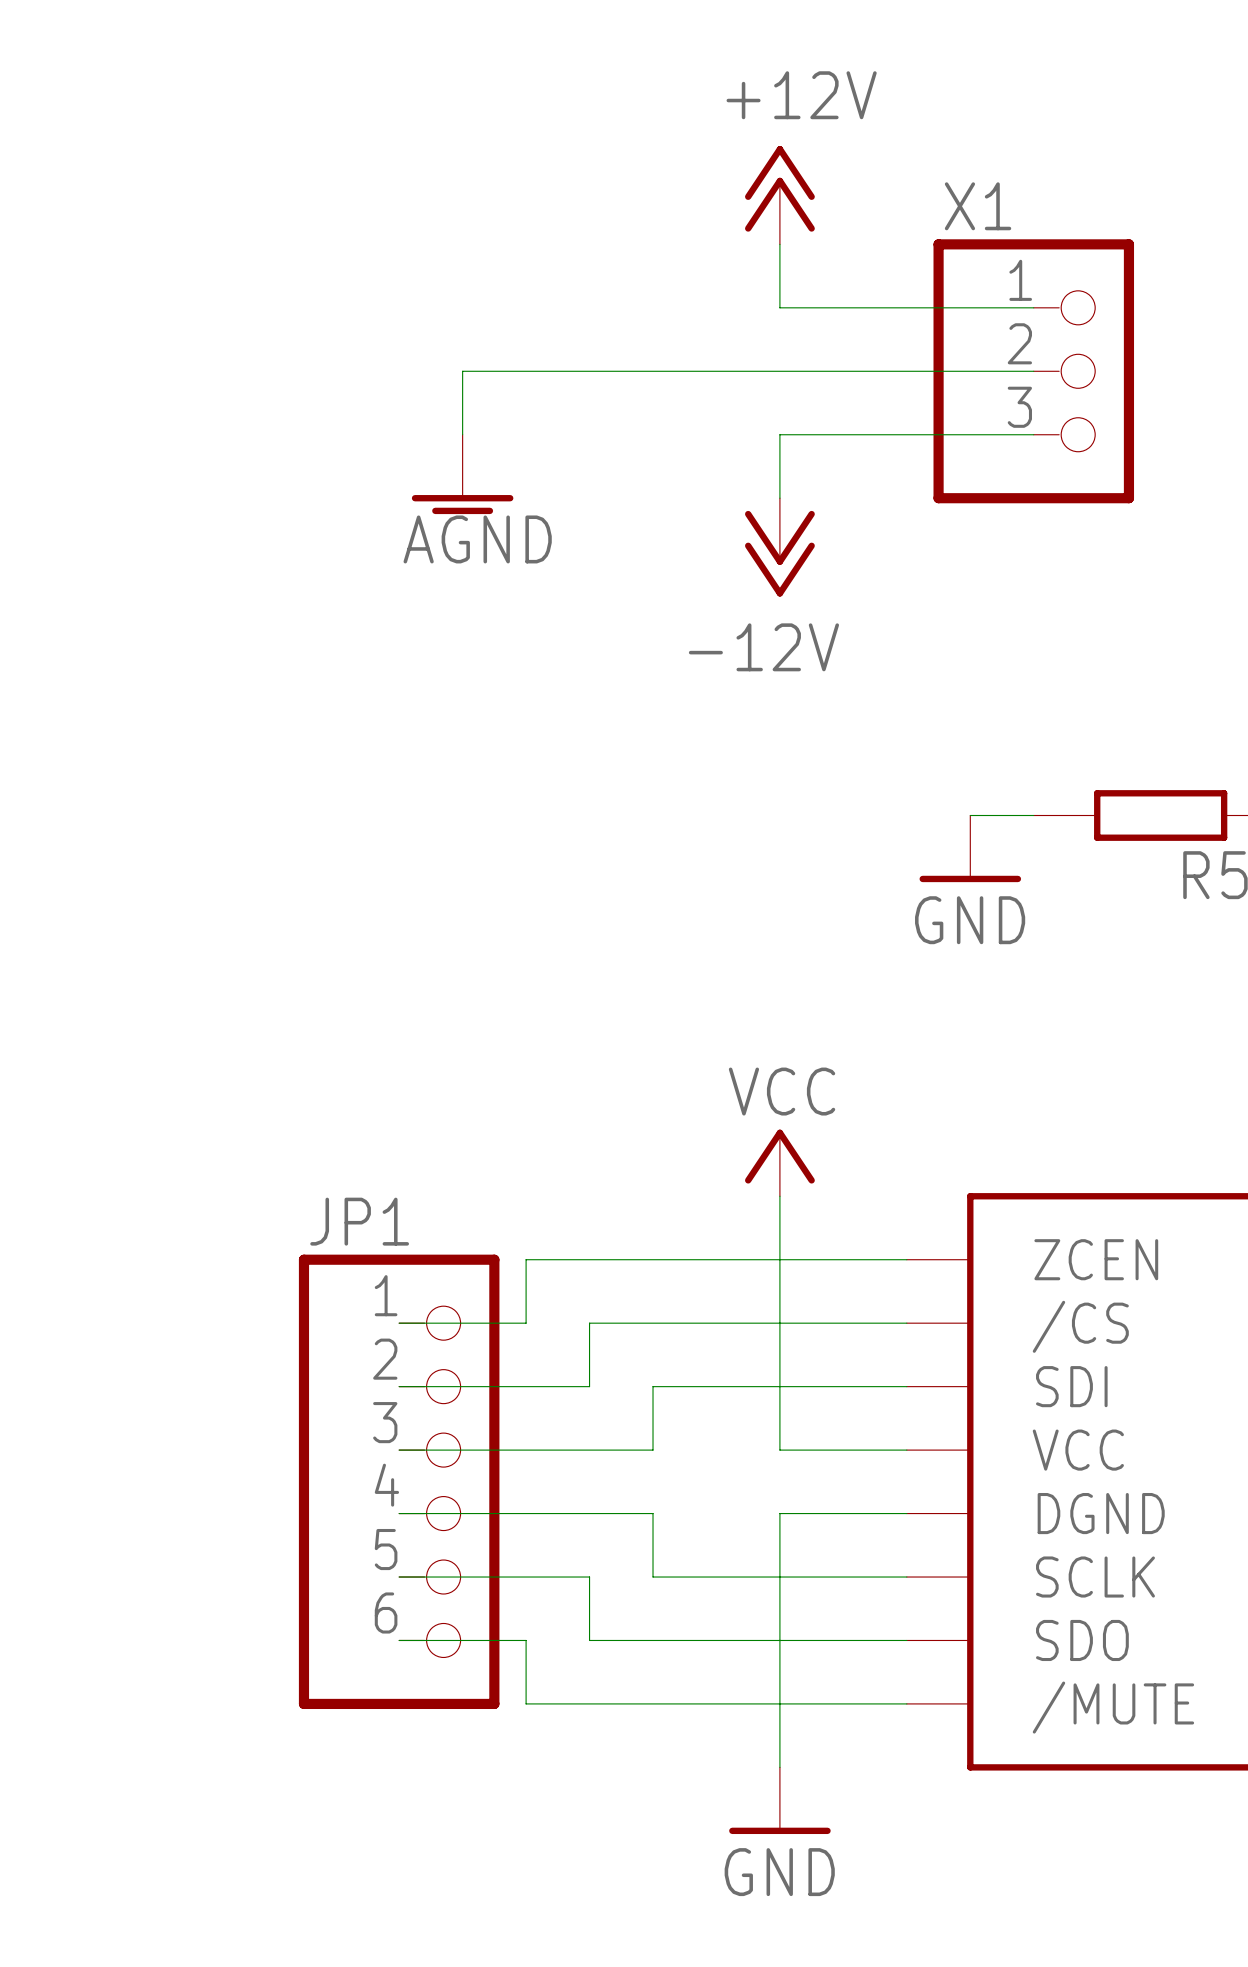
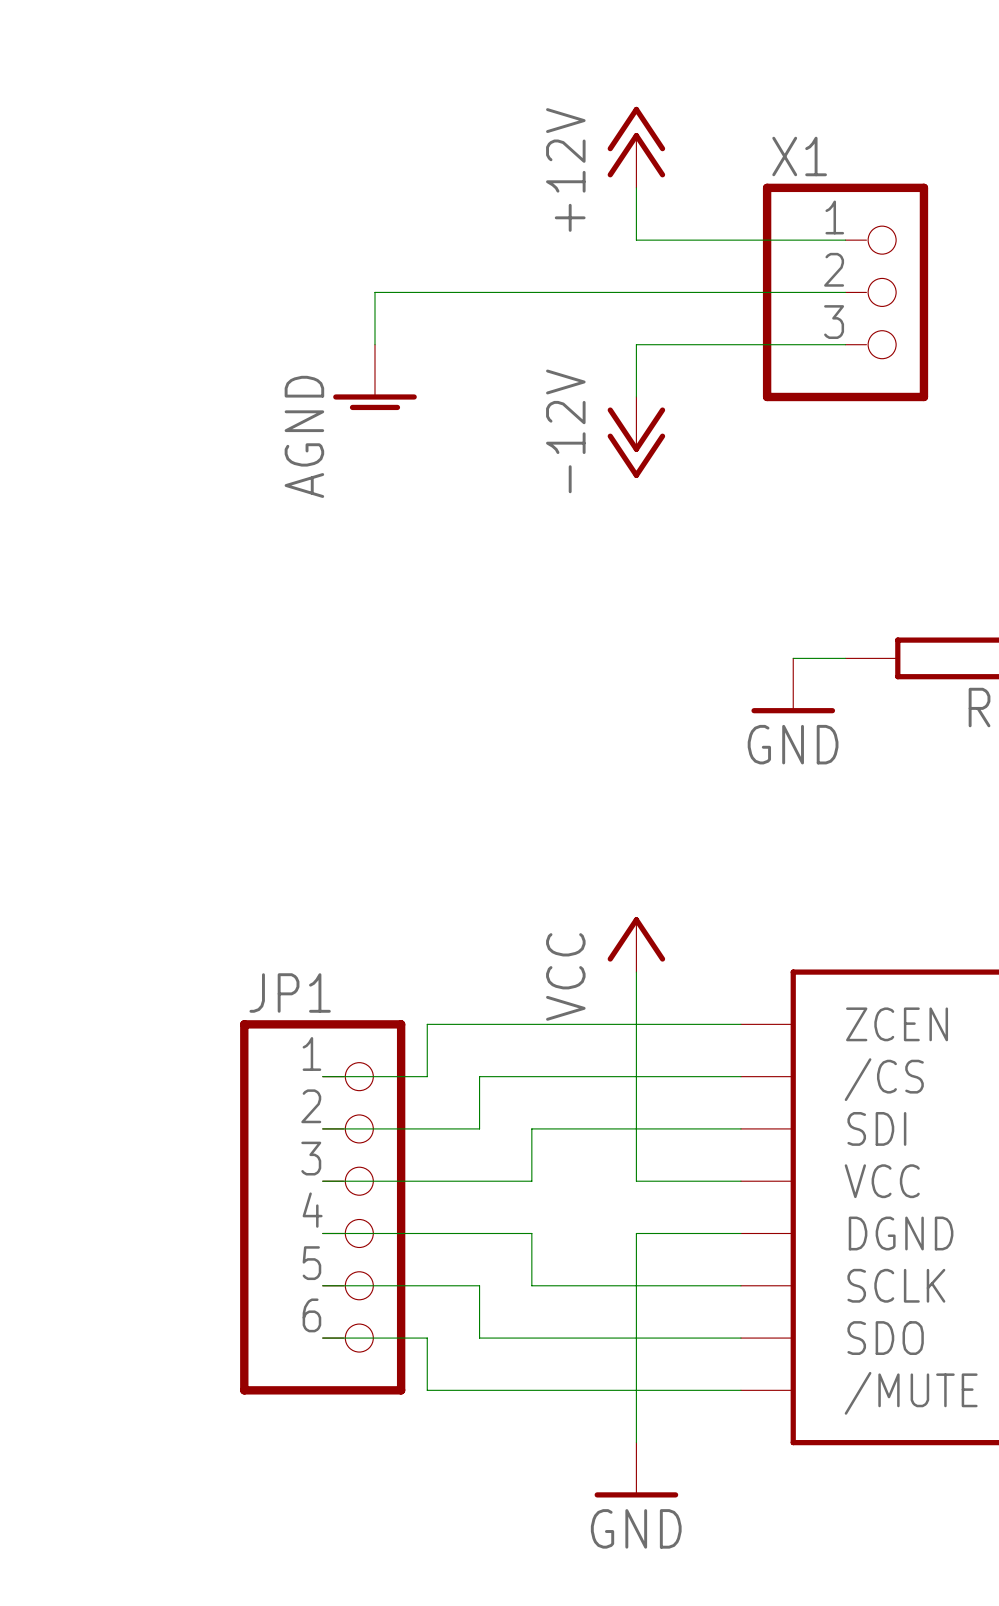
power symbol text rotation: 0° (801, 95) -> 90° counterclockwise (565, 169)
power symbol text rotation: 0° (477, 539) -> 90° counterclockwise (304, 436)
power symbol text rotation: 0° (763, 647) -> 90° counterclockwise (565, 431)
power symbol text rotation: 0° (782, 1091) -> 90° counterclockwise (565, 976)

